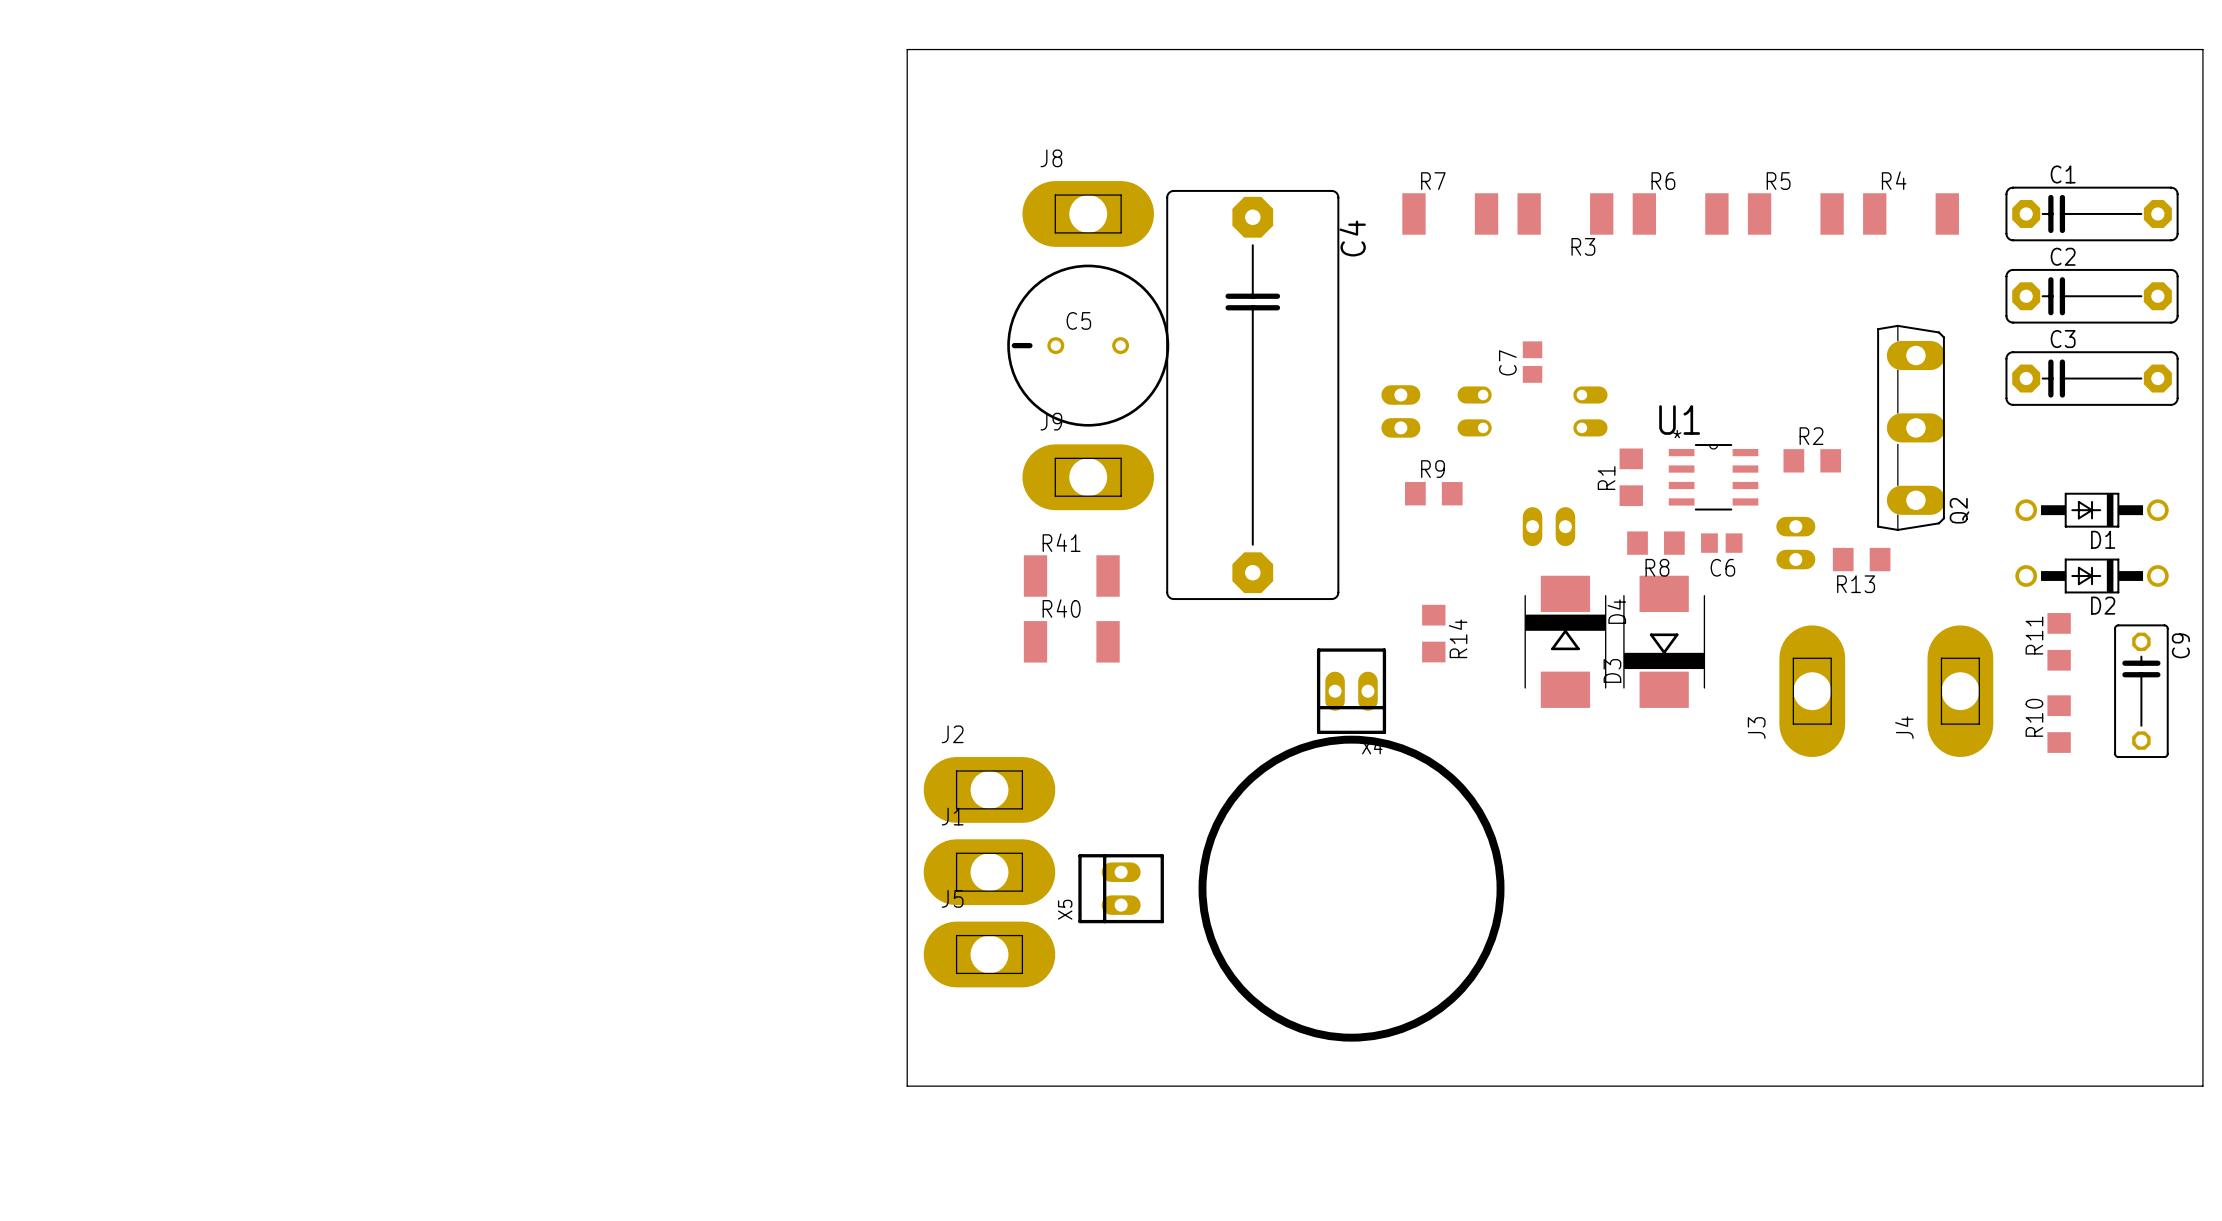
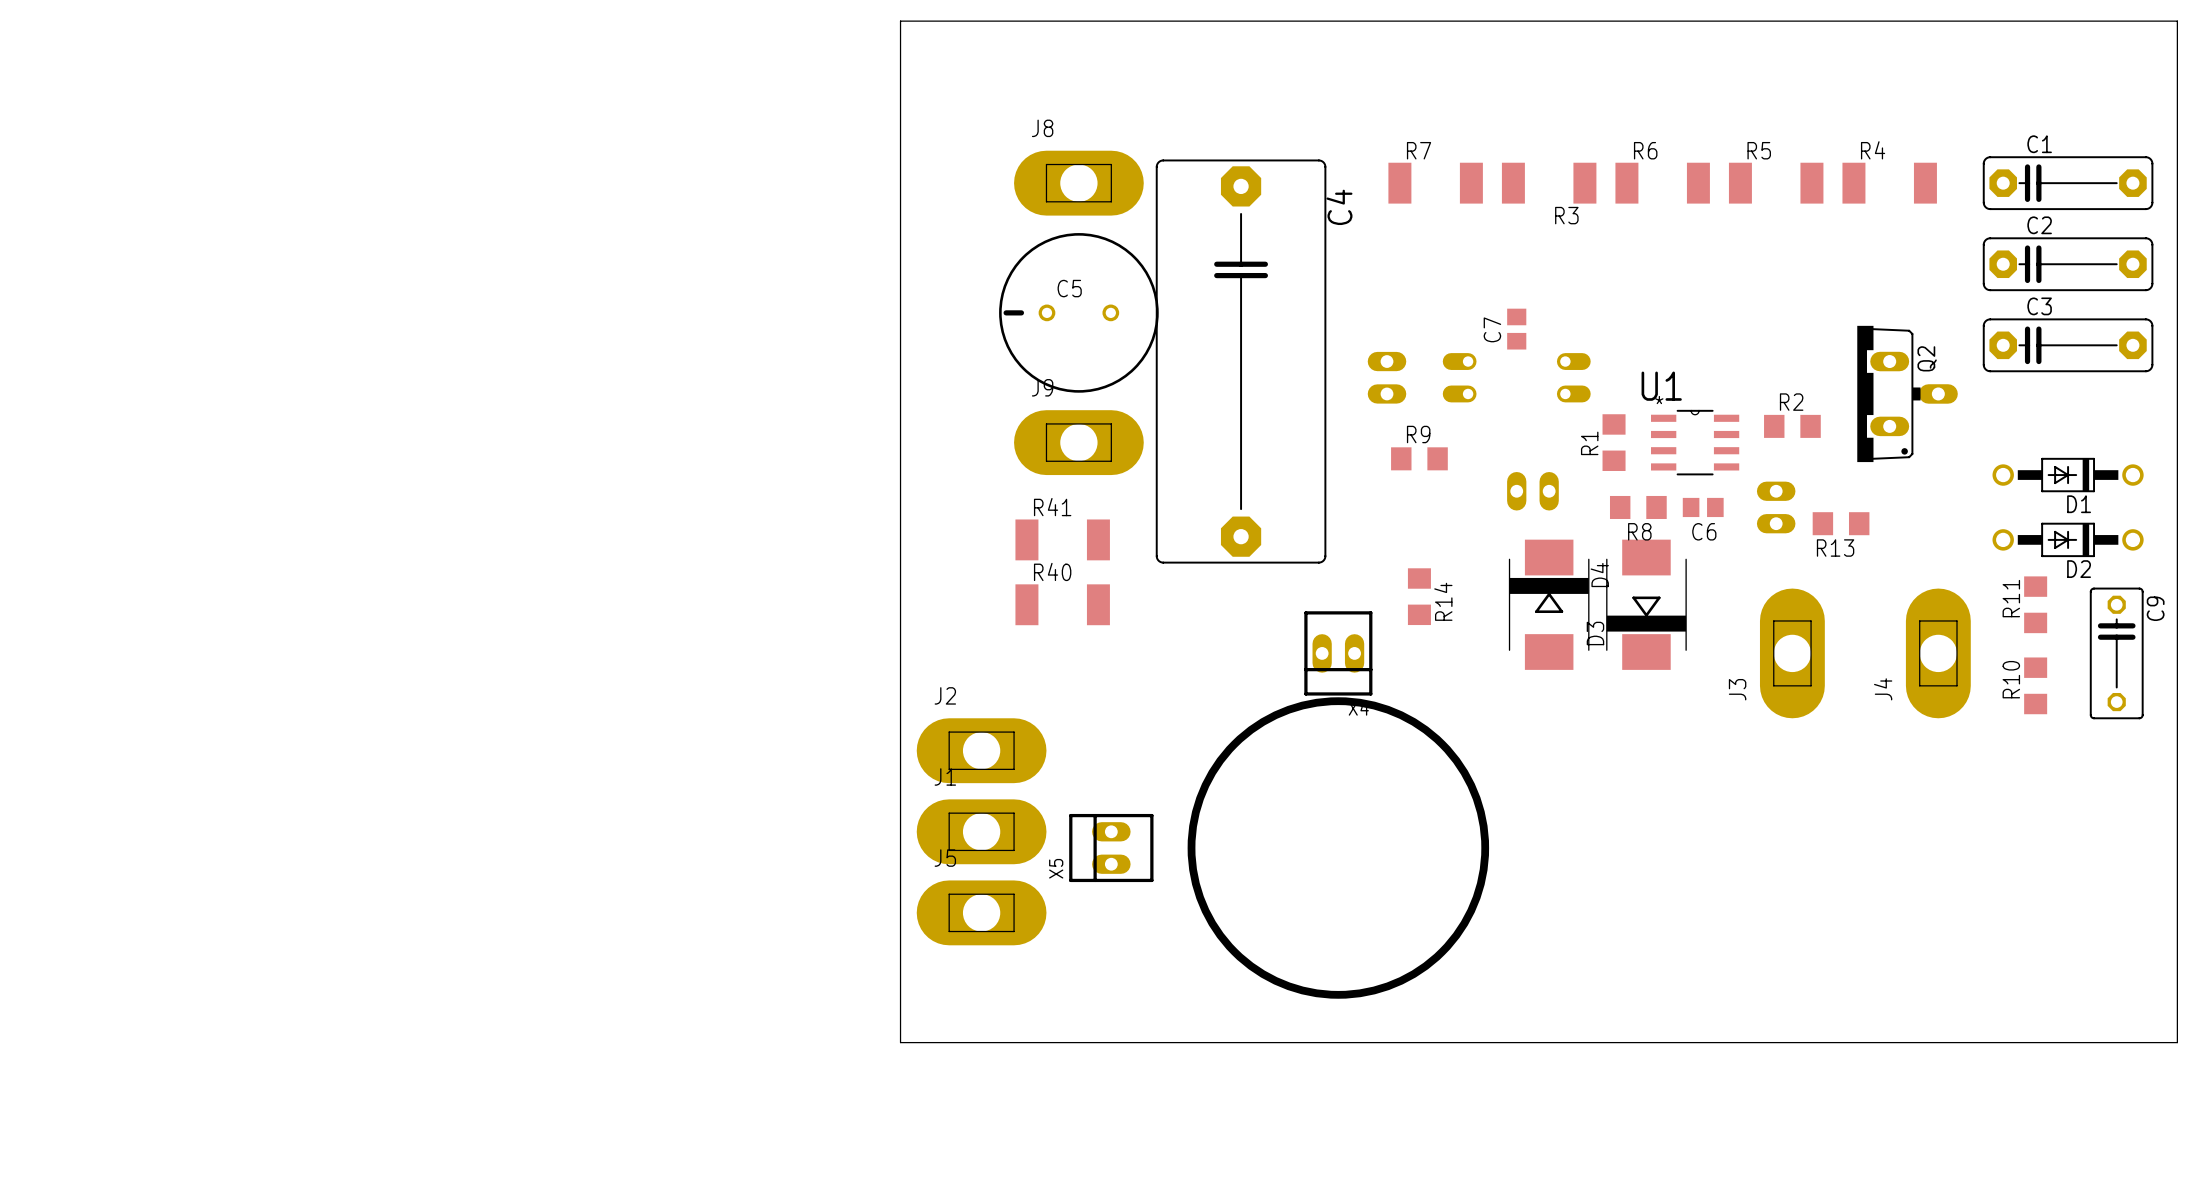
Q2 footprint: [1877, 324, 1946, 531] -> [1857, 325, 1958, 463]
Q2 name position: Q2 (1959, 510) -> Q2 (1927, 358)

